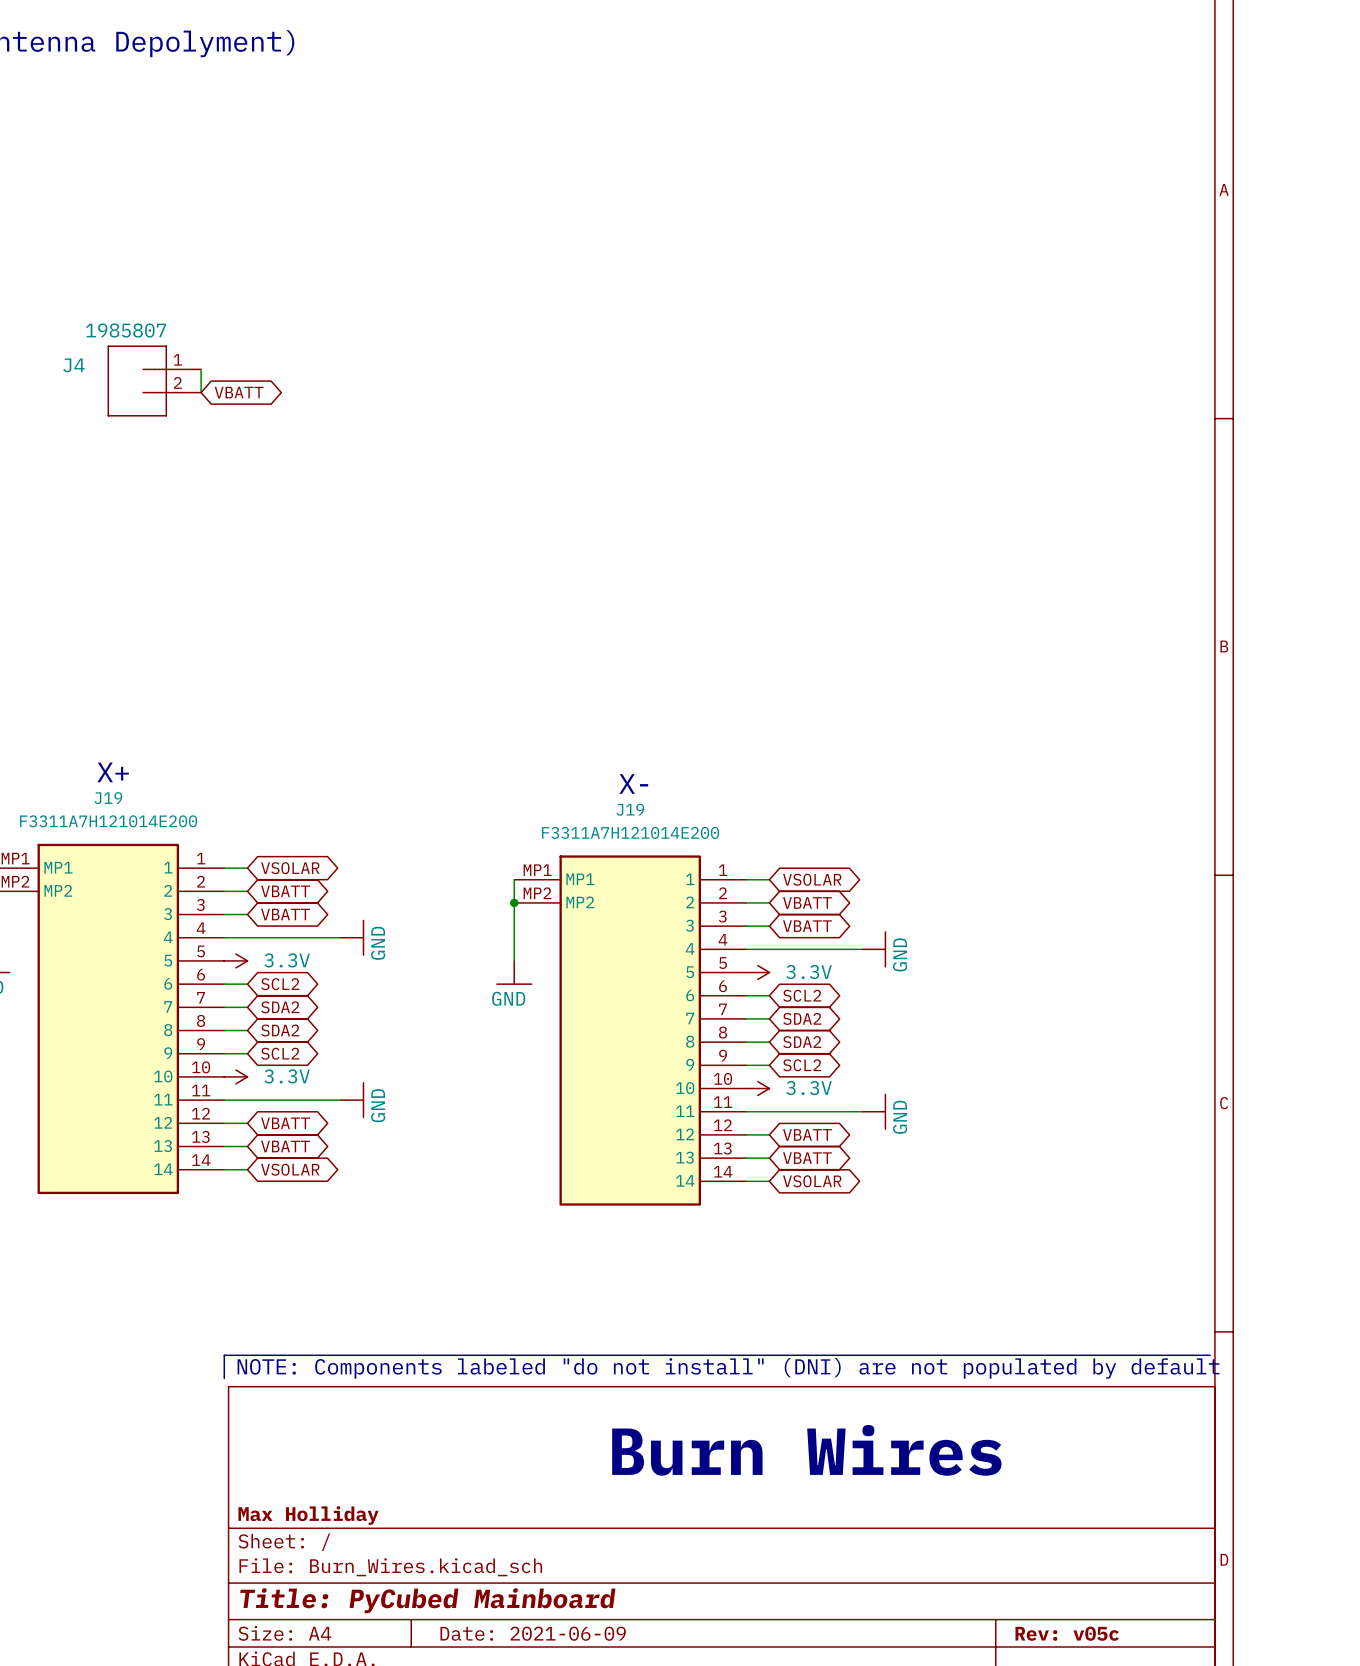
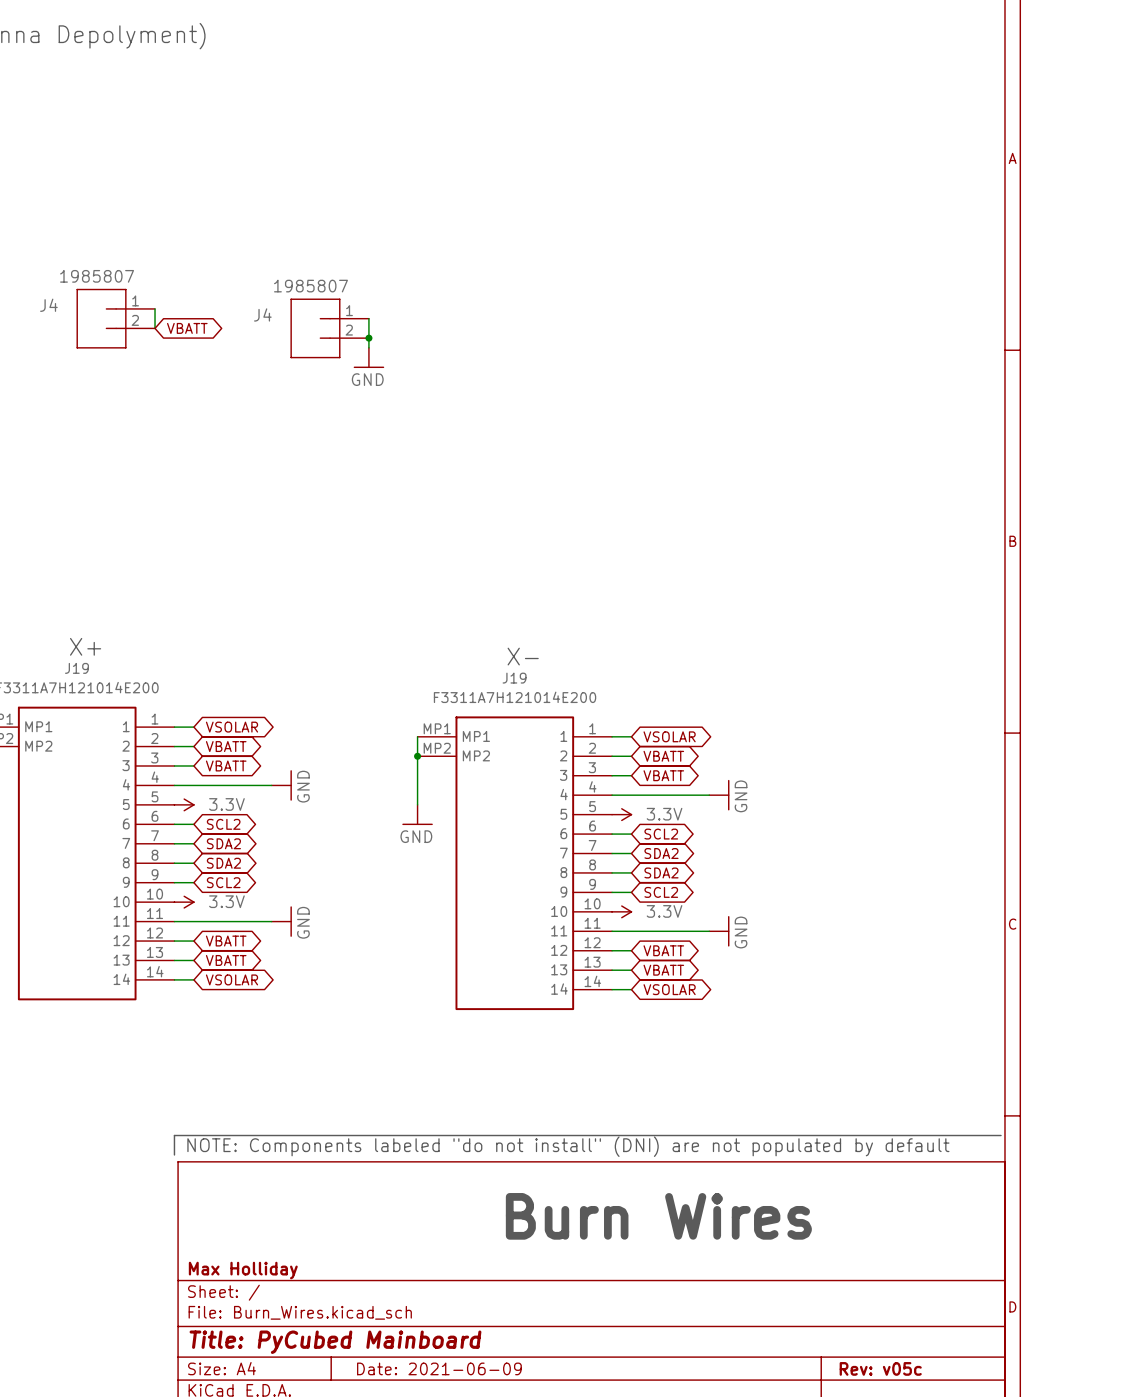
wire: none -> (368, 318) (368, 347)
J4: none -> 1985807 (330, 328)
junction: none -> (368, 338)
power symbol: none -> GND (368, 357)

